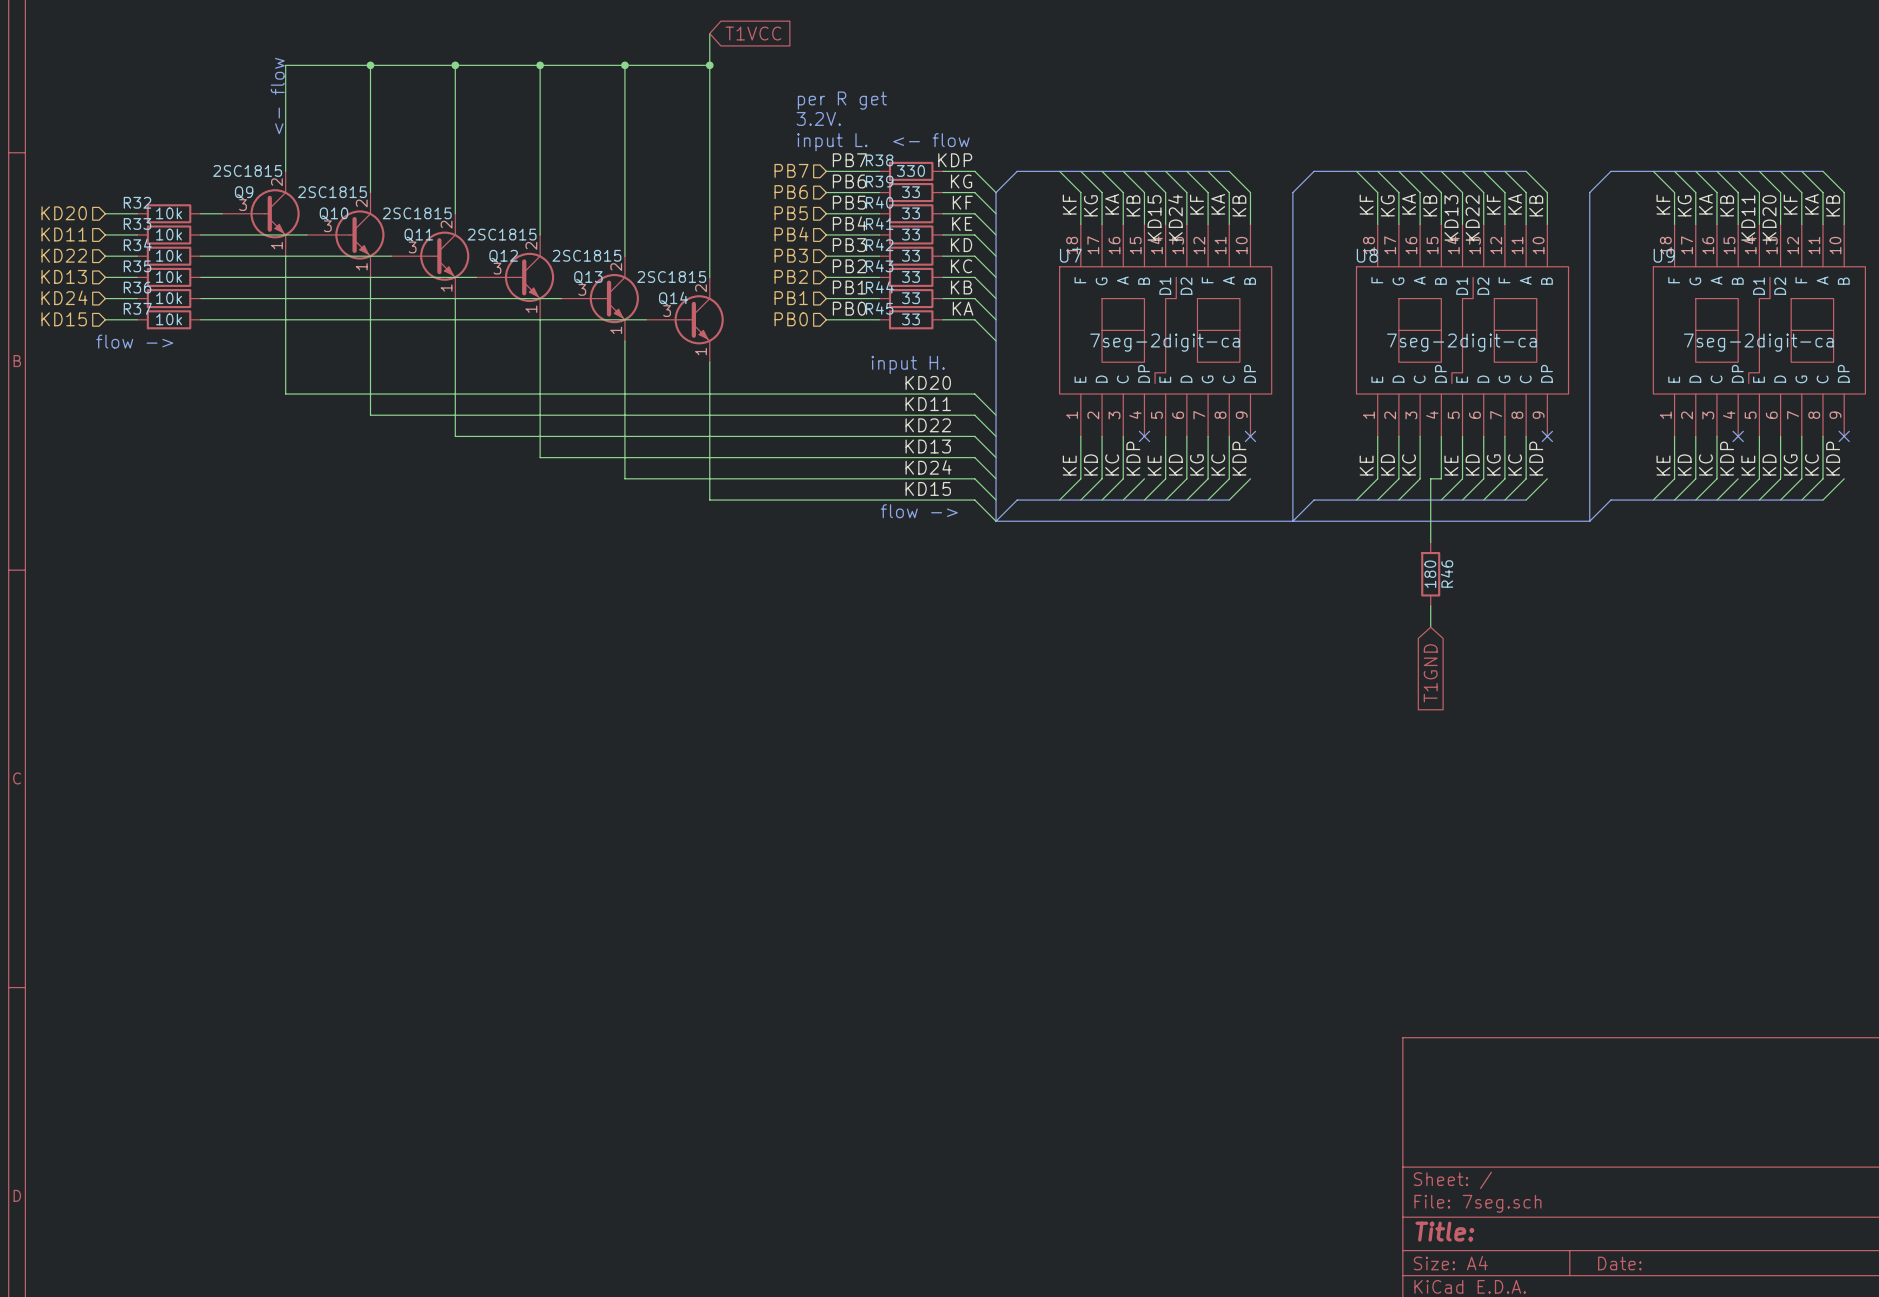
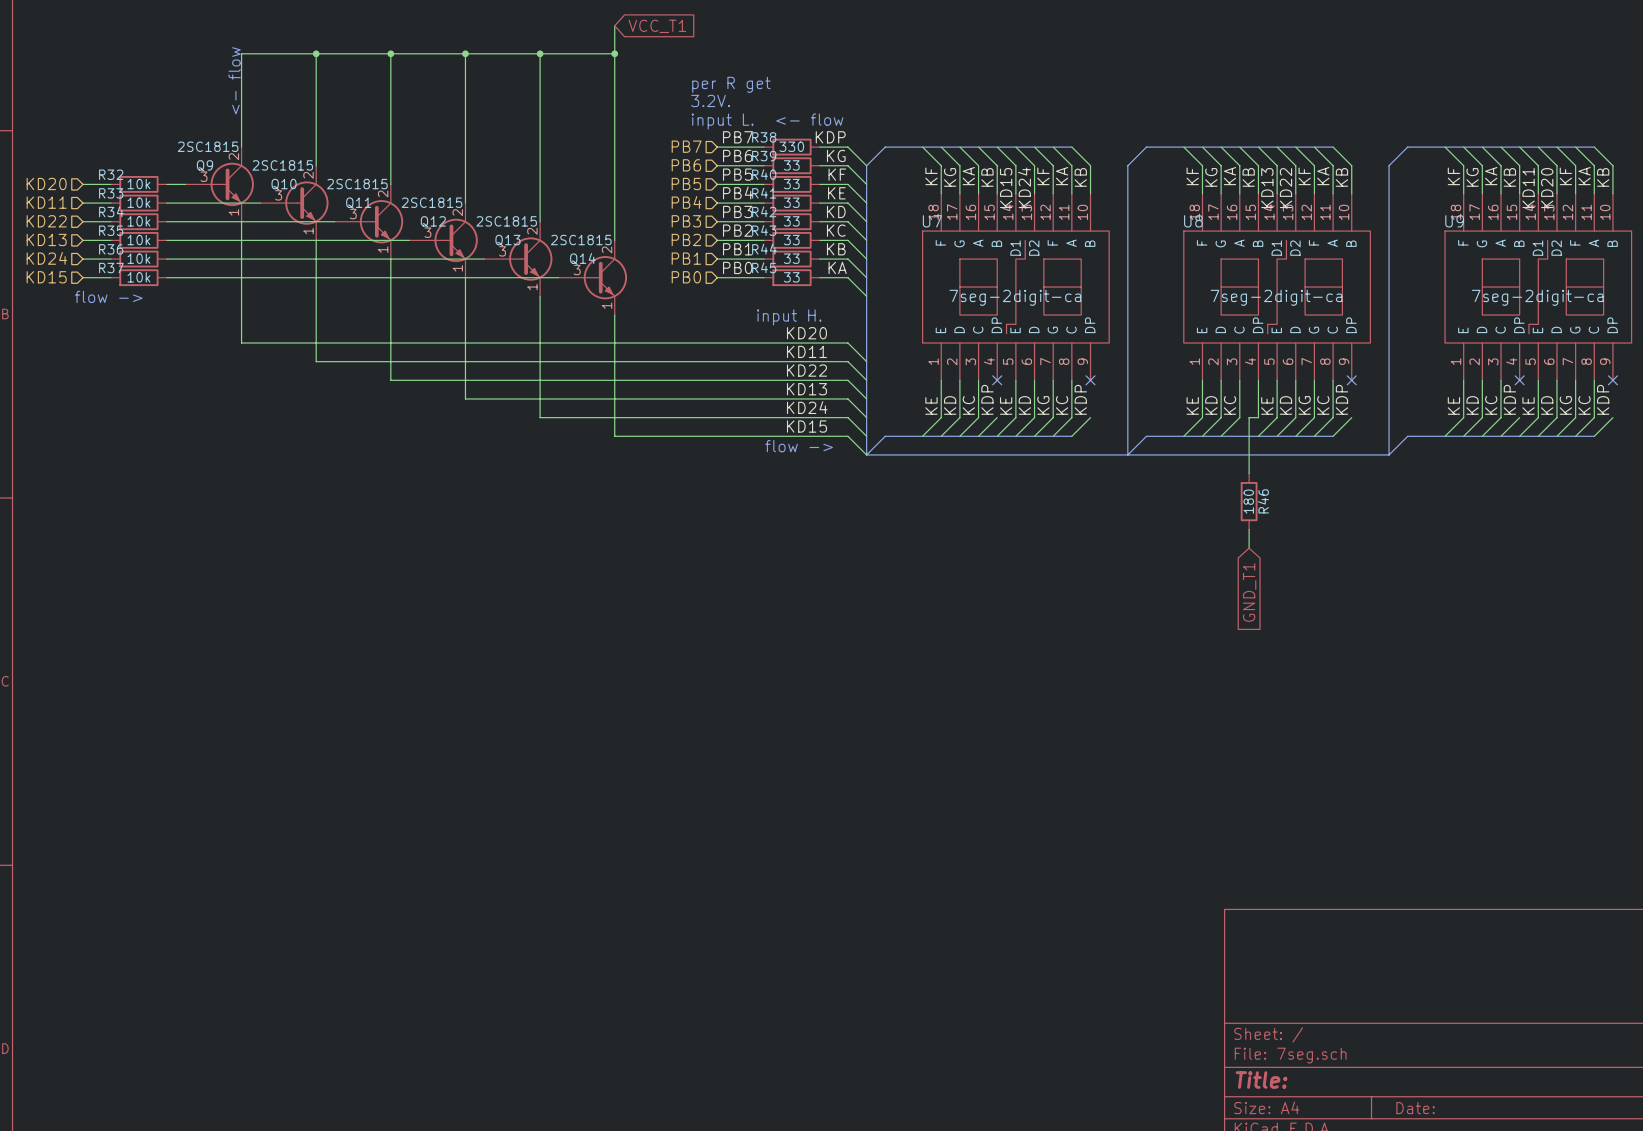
global label: T1VCC (753, 33) -> VCC_T1 (657, 26)
global label: T1GND (1430, 673) -> GND_T1 (1249, 592)

